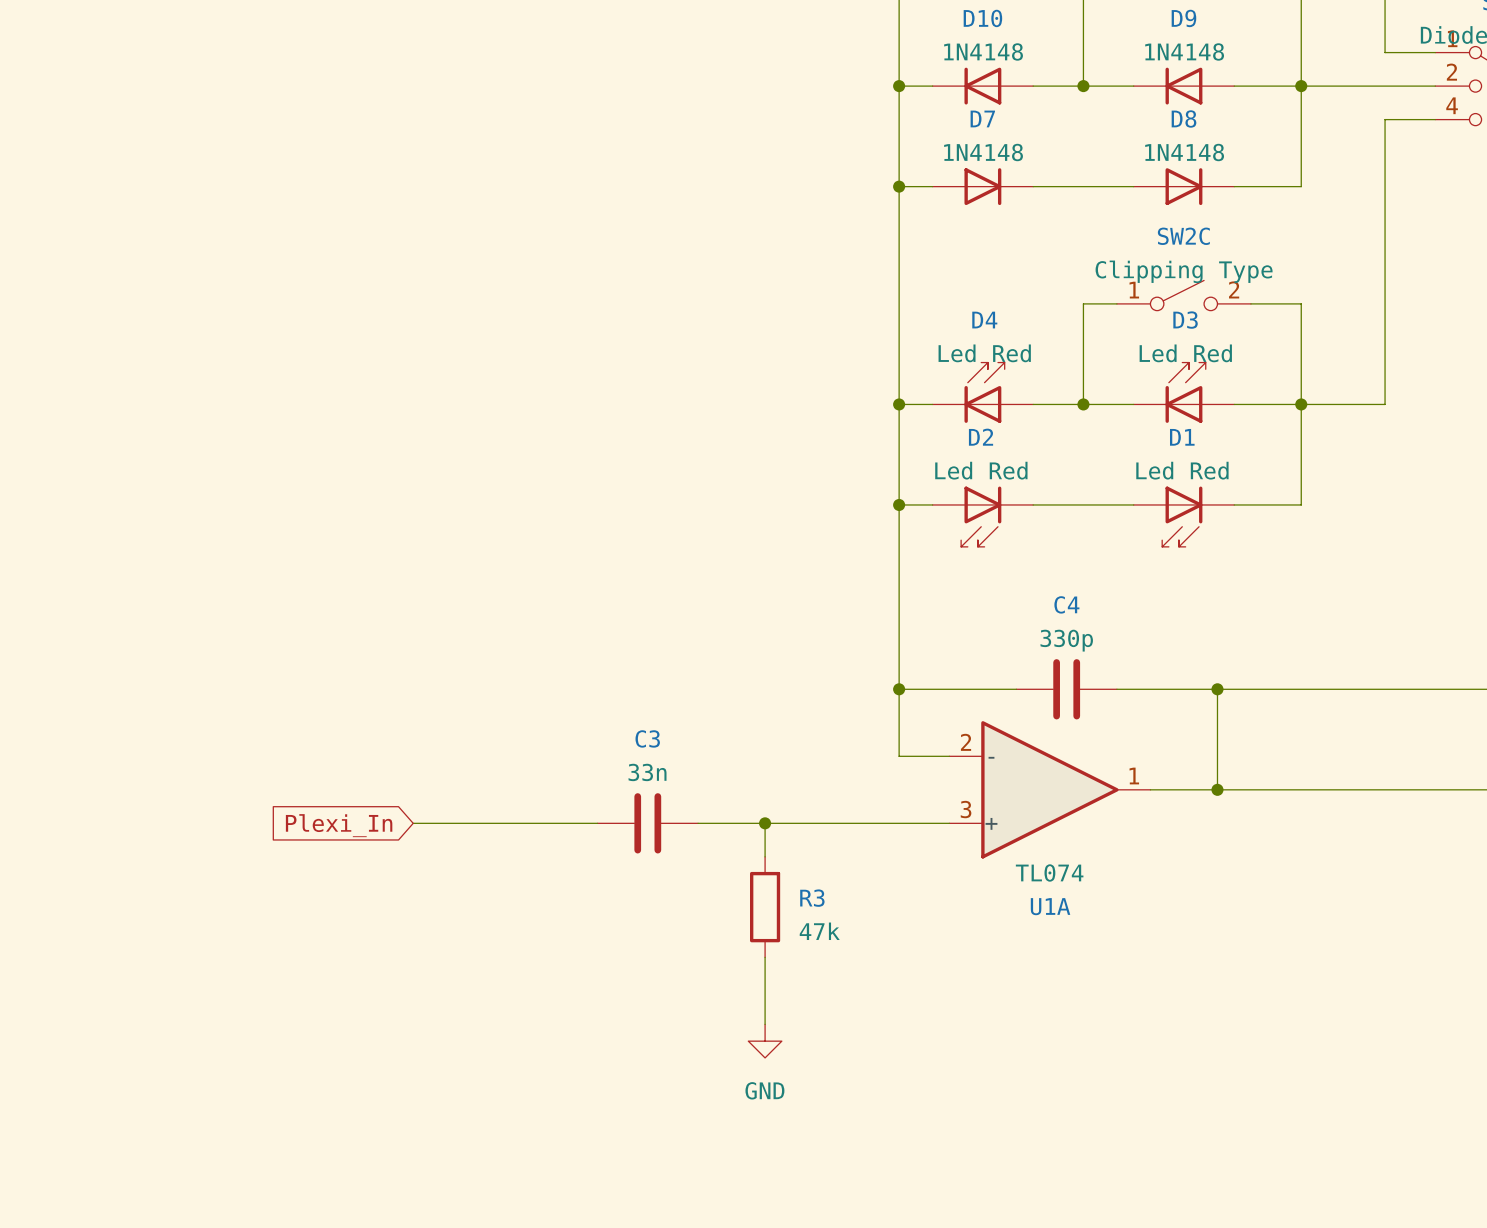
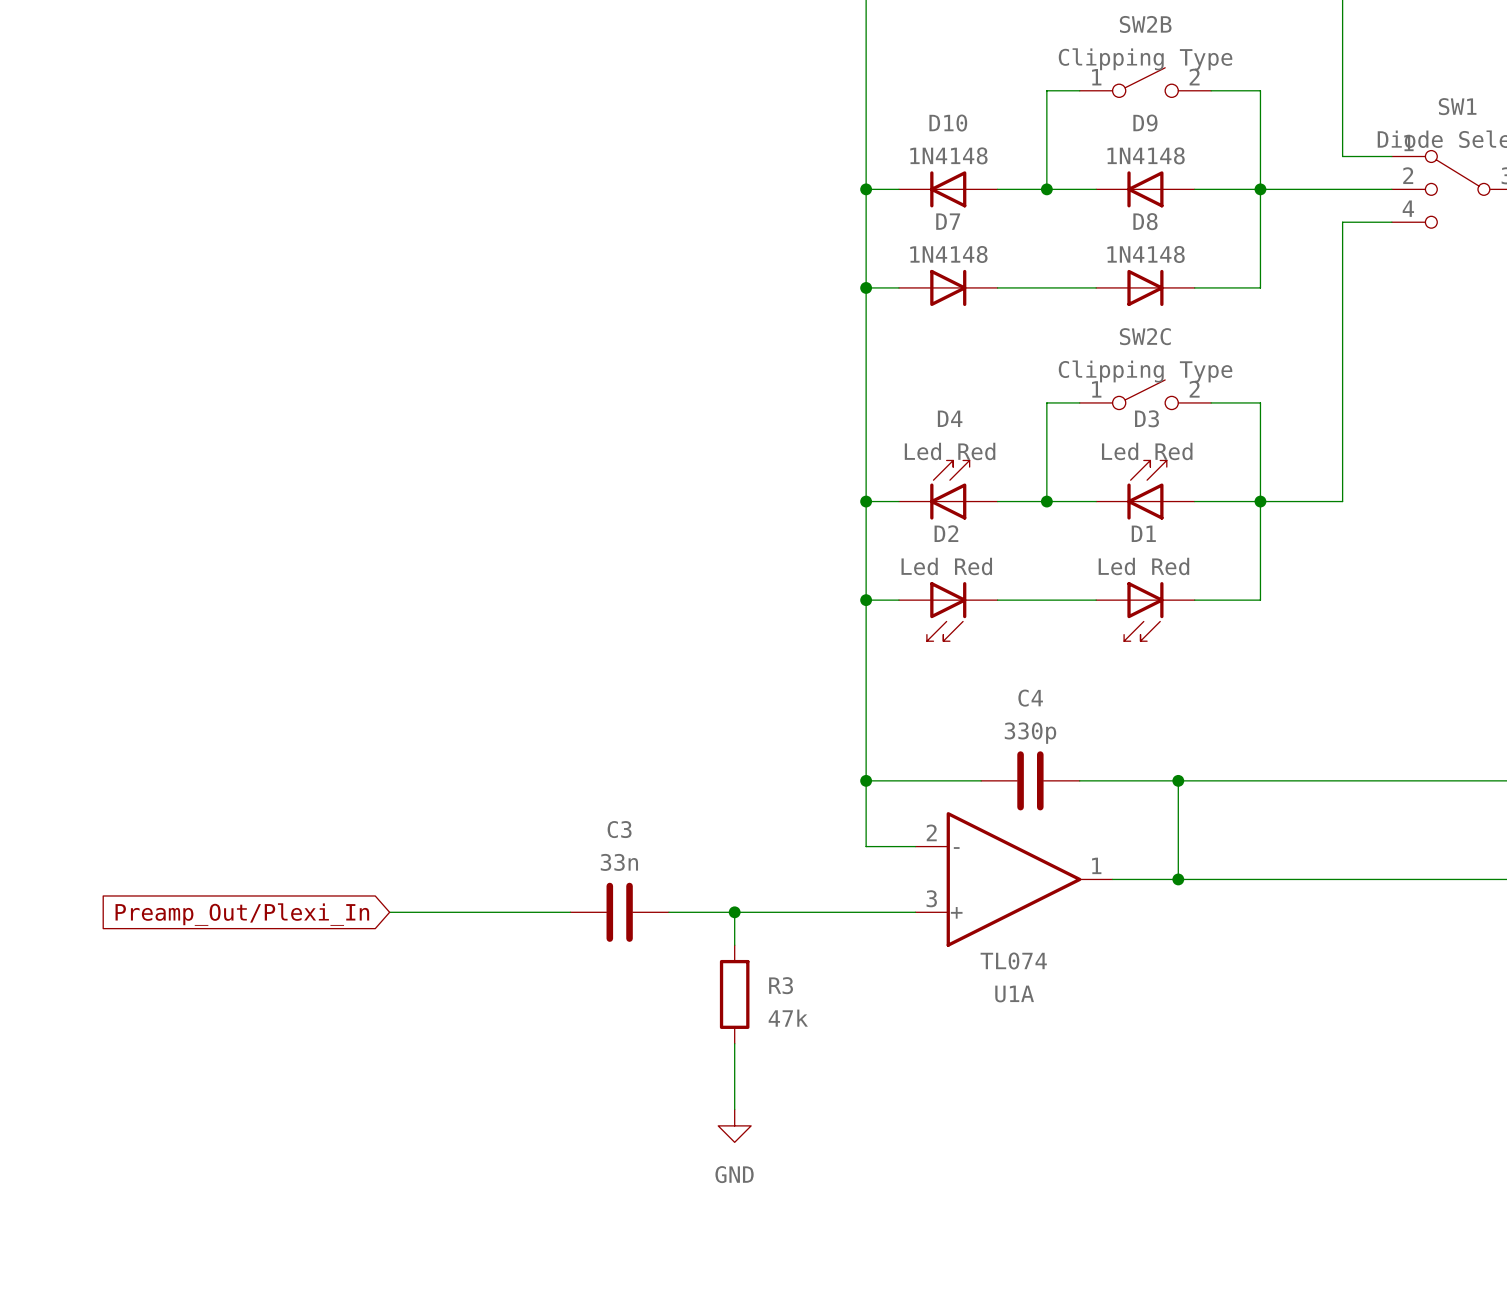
global label: Plexi_In (339, 825) -> Preamp_Out/Plexi_In (242, 914)

